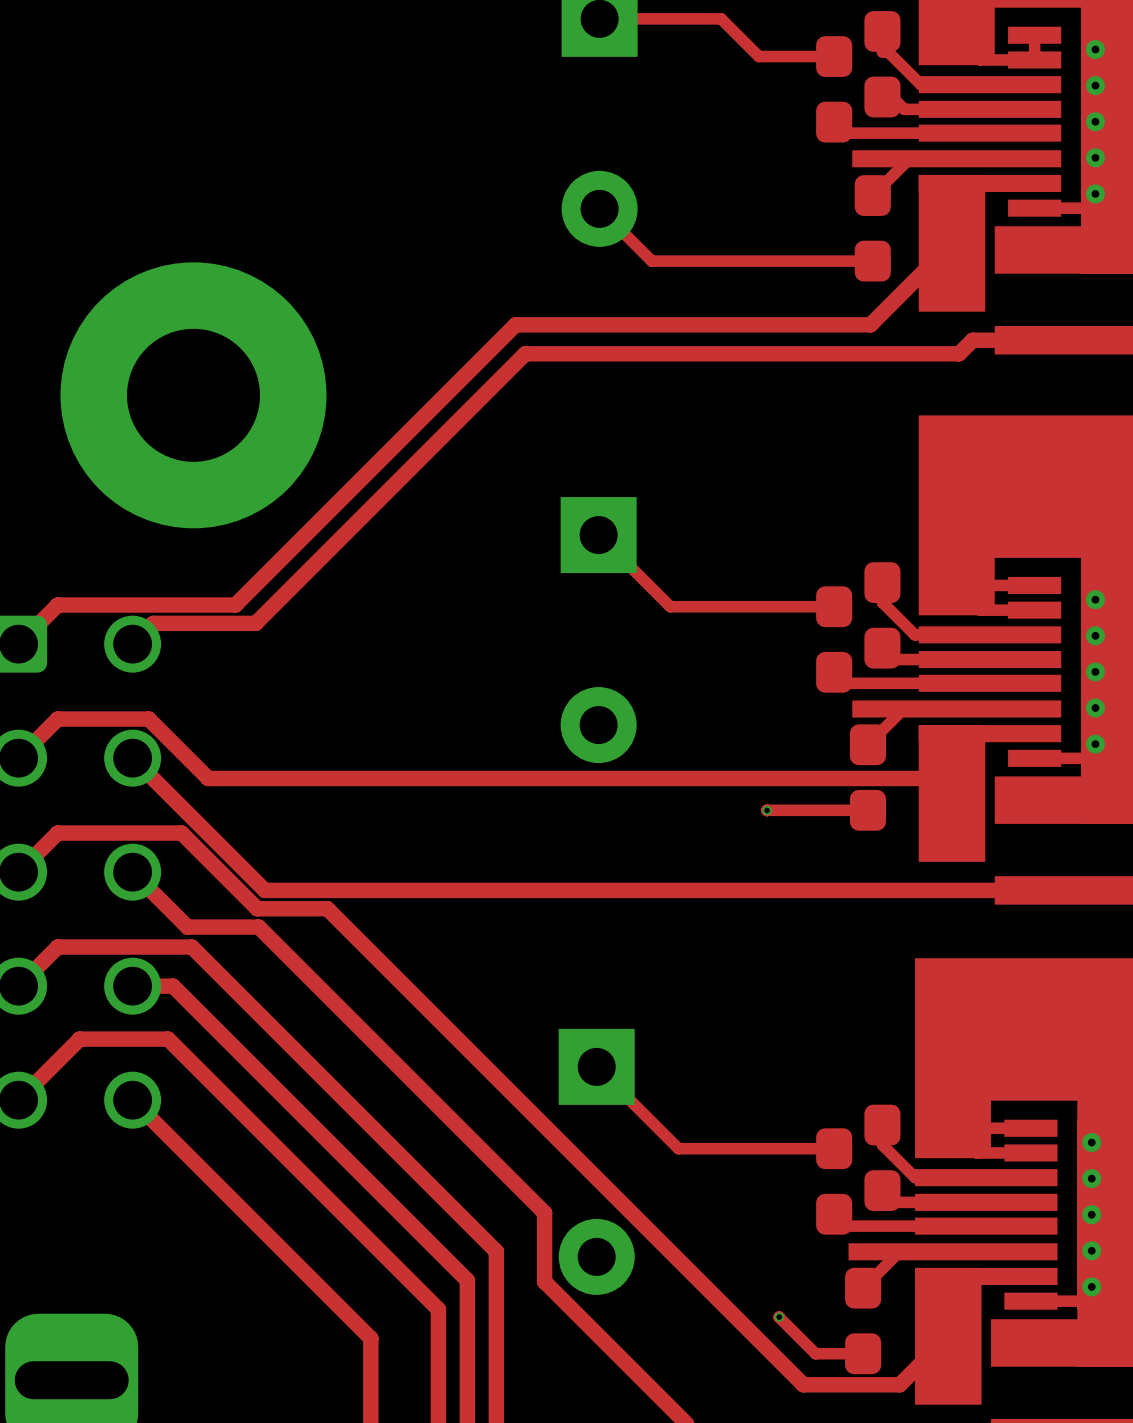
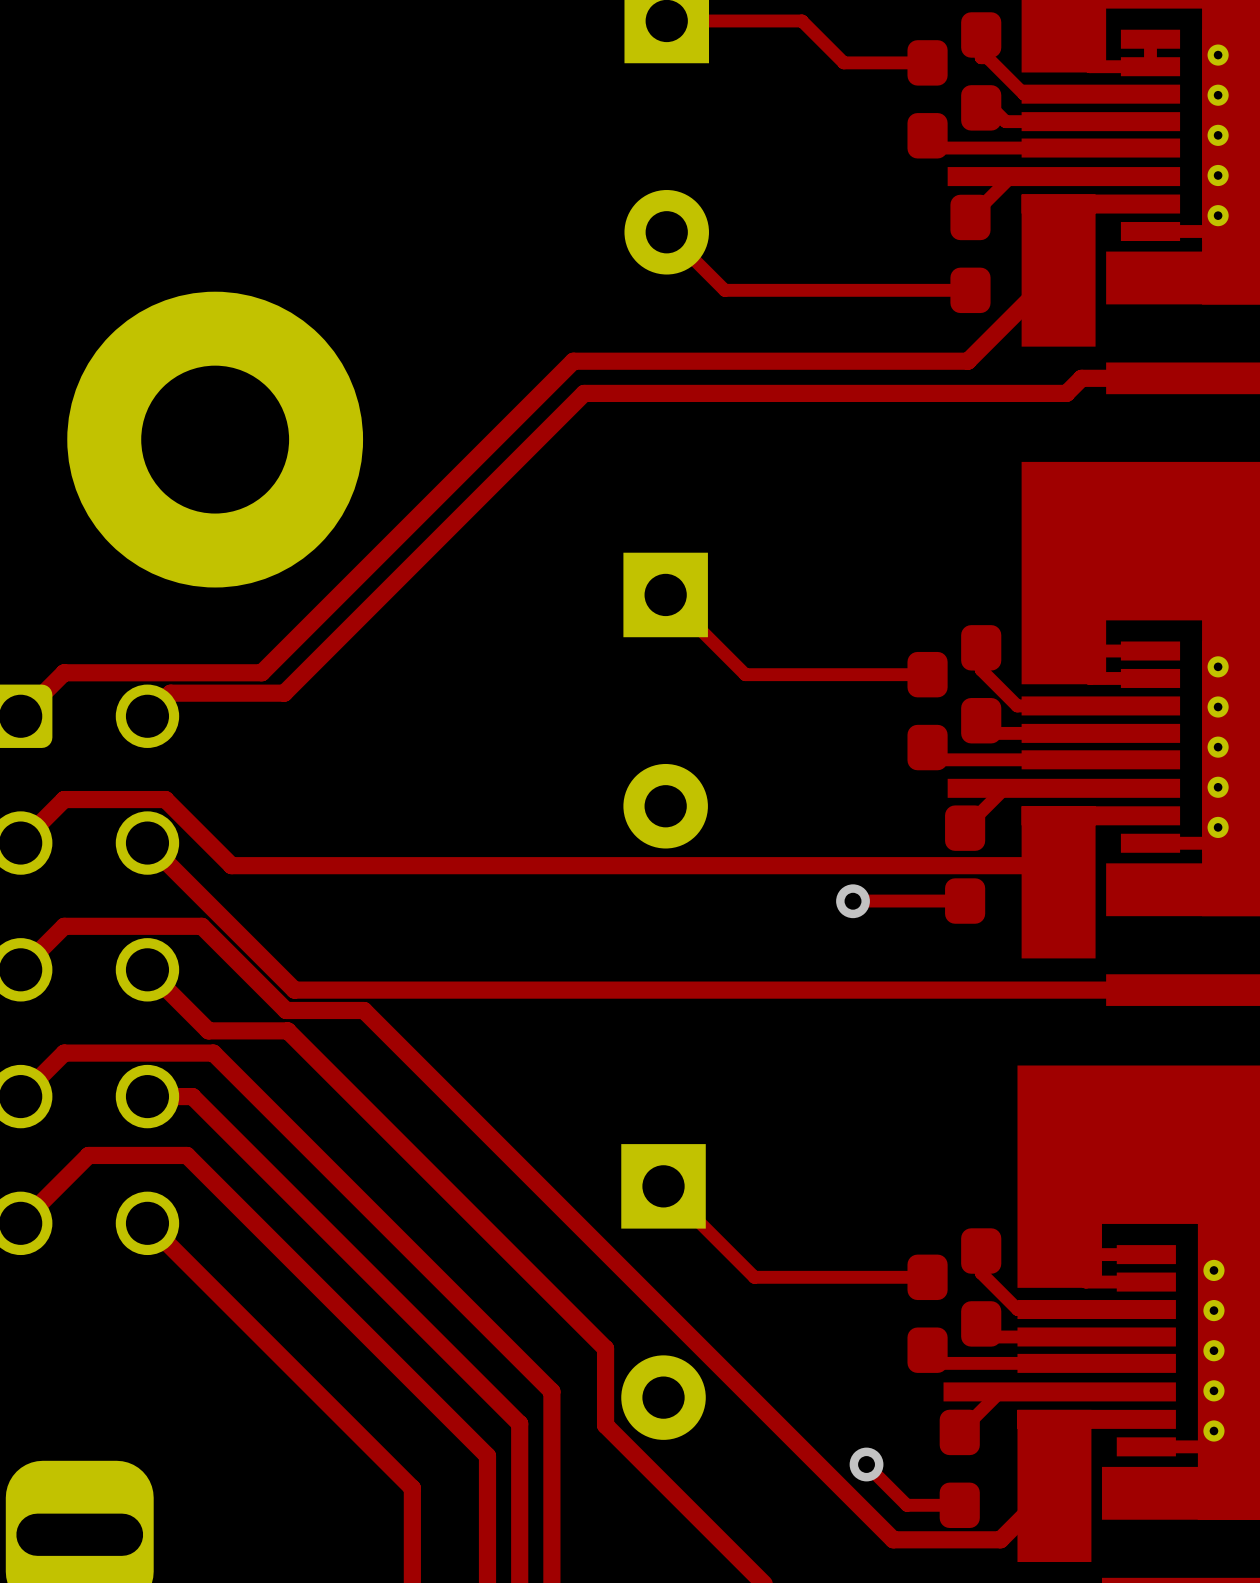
via size: [762, 805, 772, 816] -> [836, 884, 870, 919]
via size: [774, 1312, 785, 1322] -> [849, 1447, 884, 1482]

